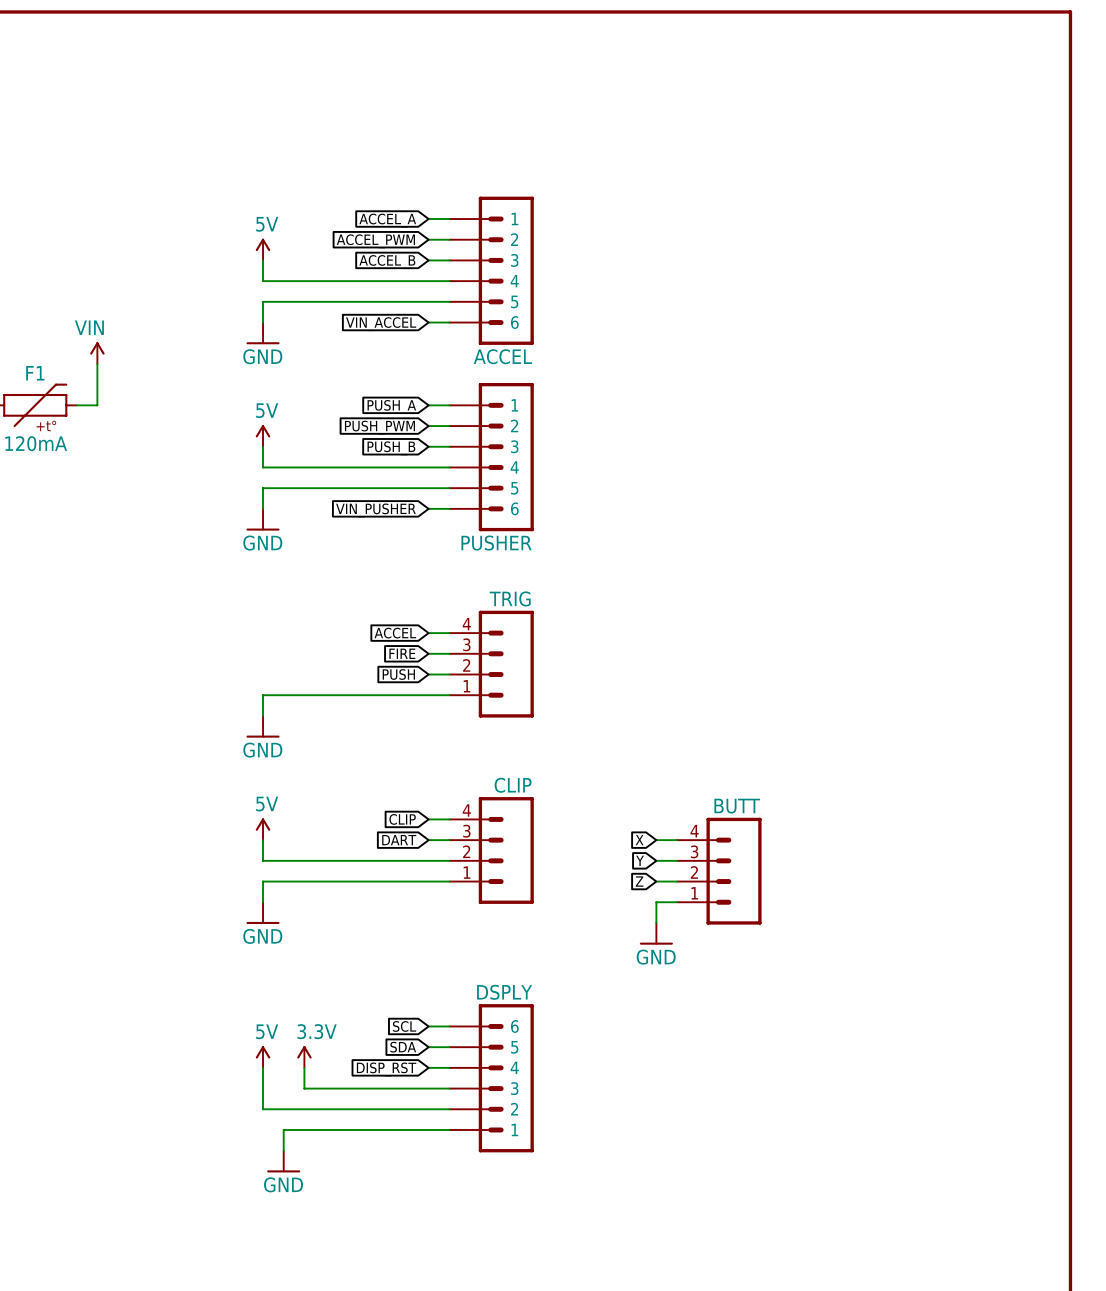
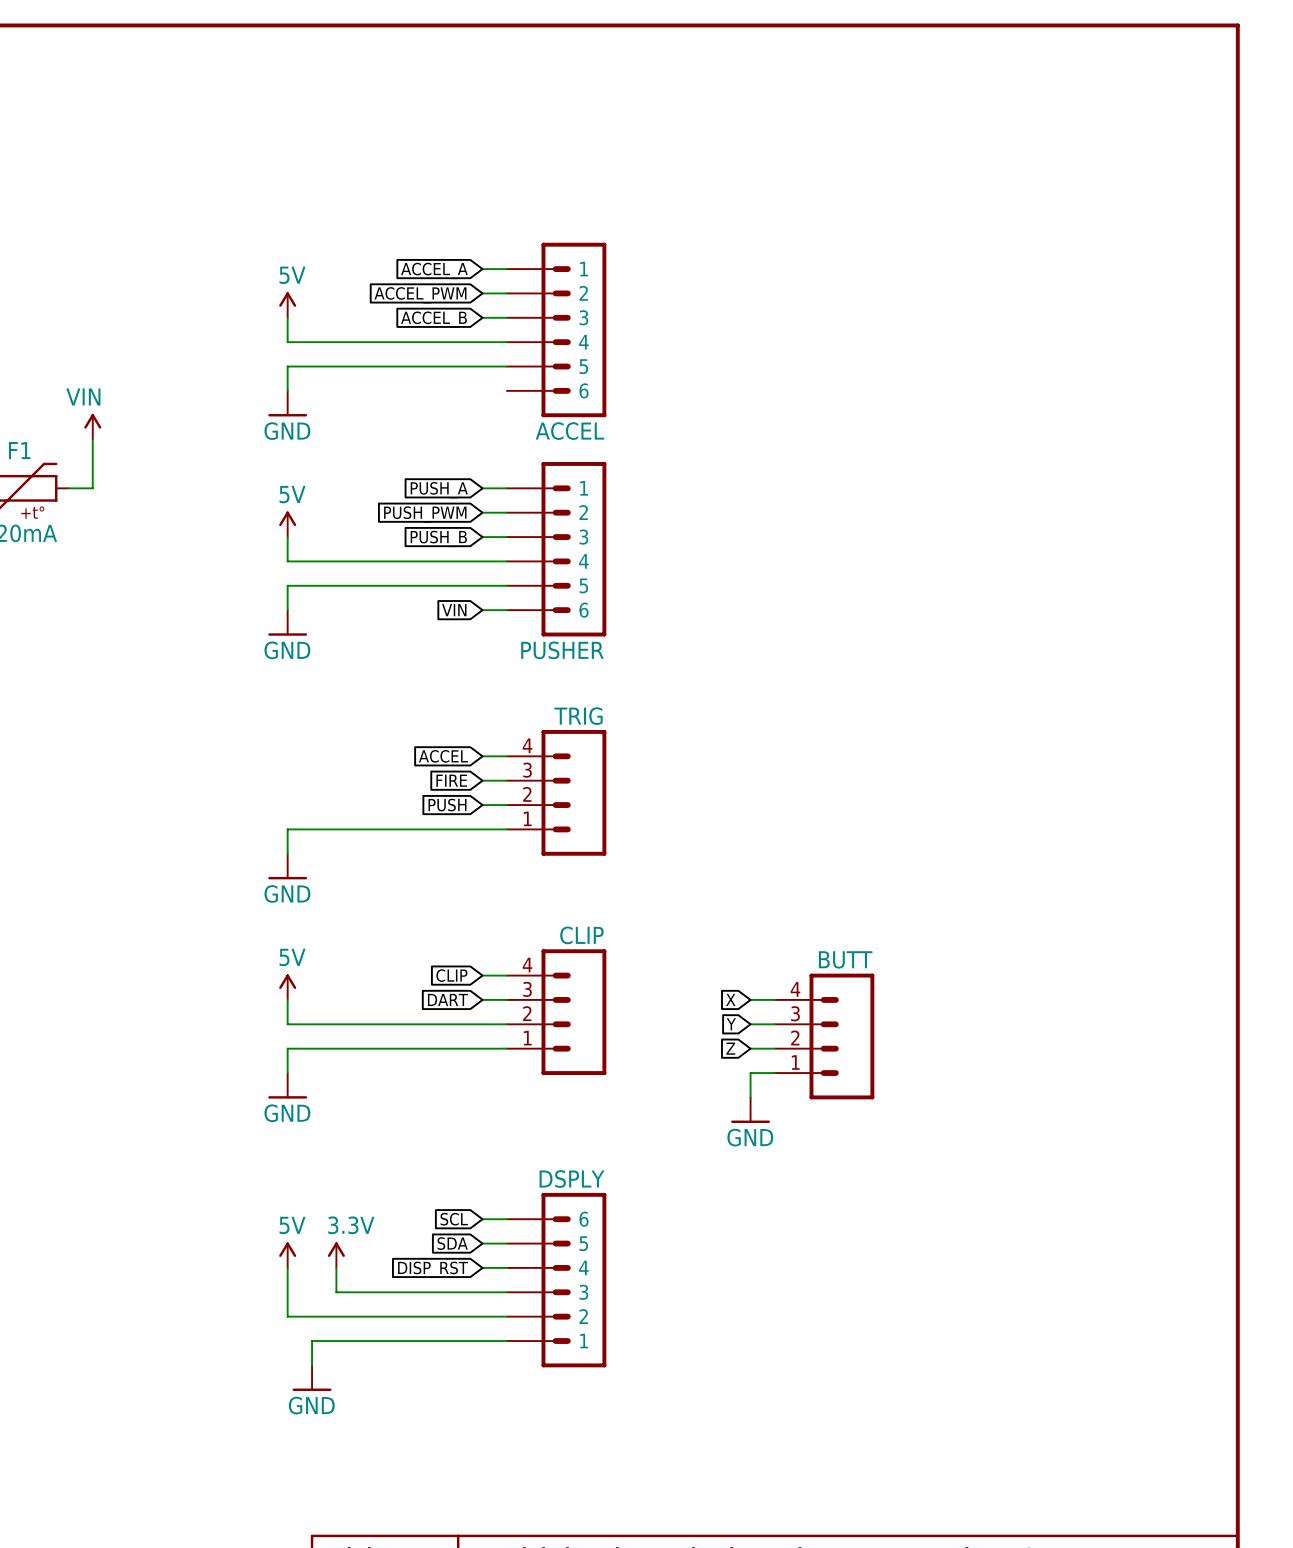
wire: (428, 322) (449, 322) -> none
global label: VIN_ACCEL (381, 324) -> none
global label: VIN_PUSHER (375, 510) -> VIN (454, 610)

